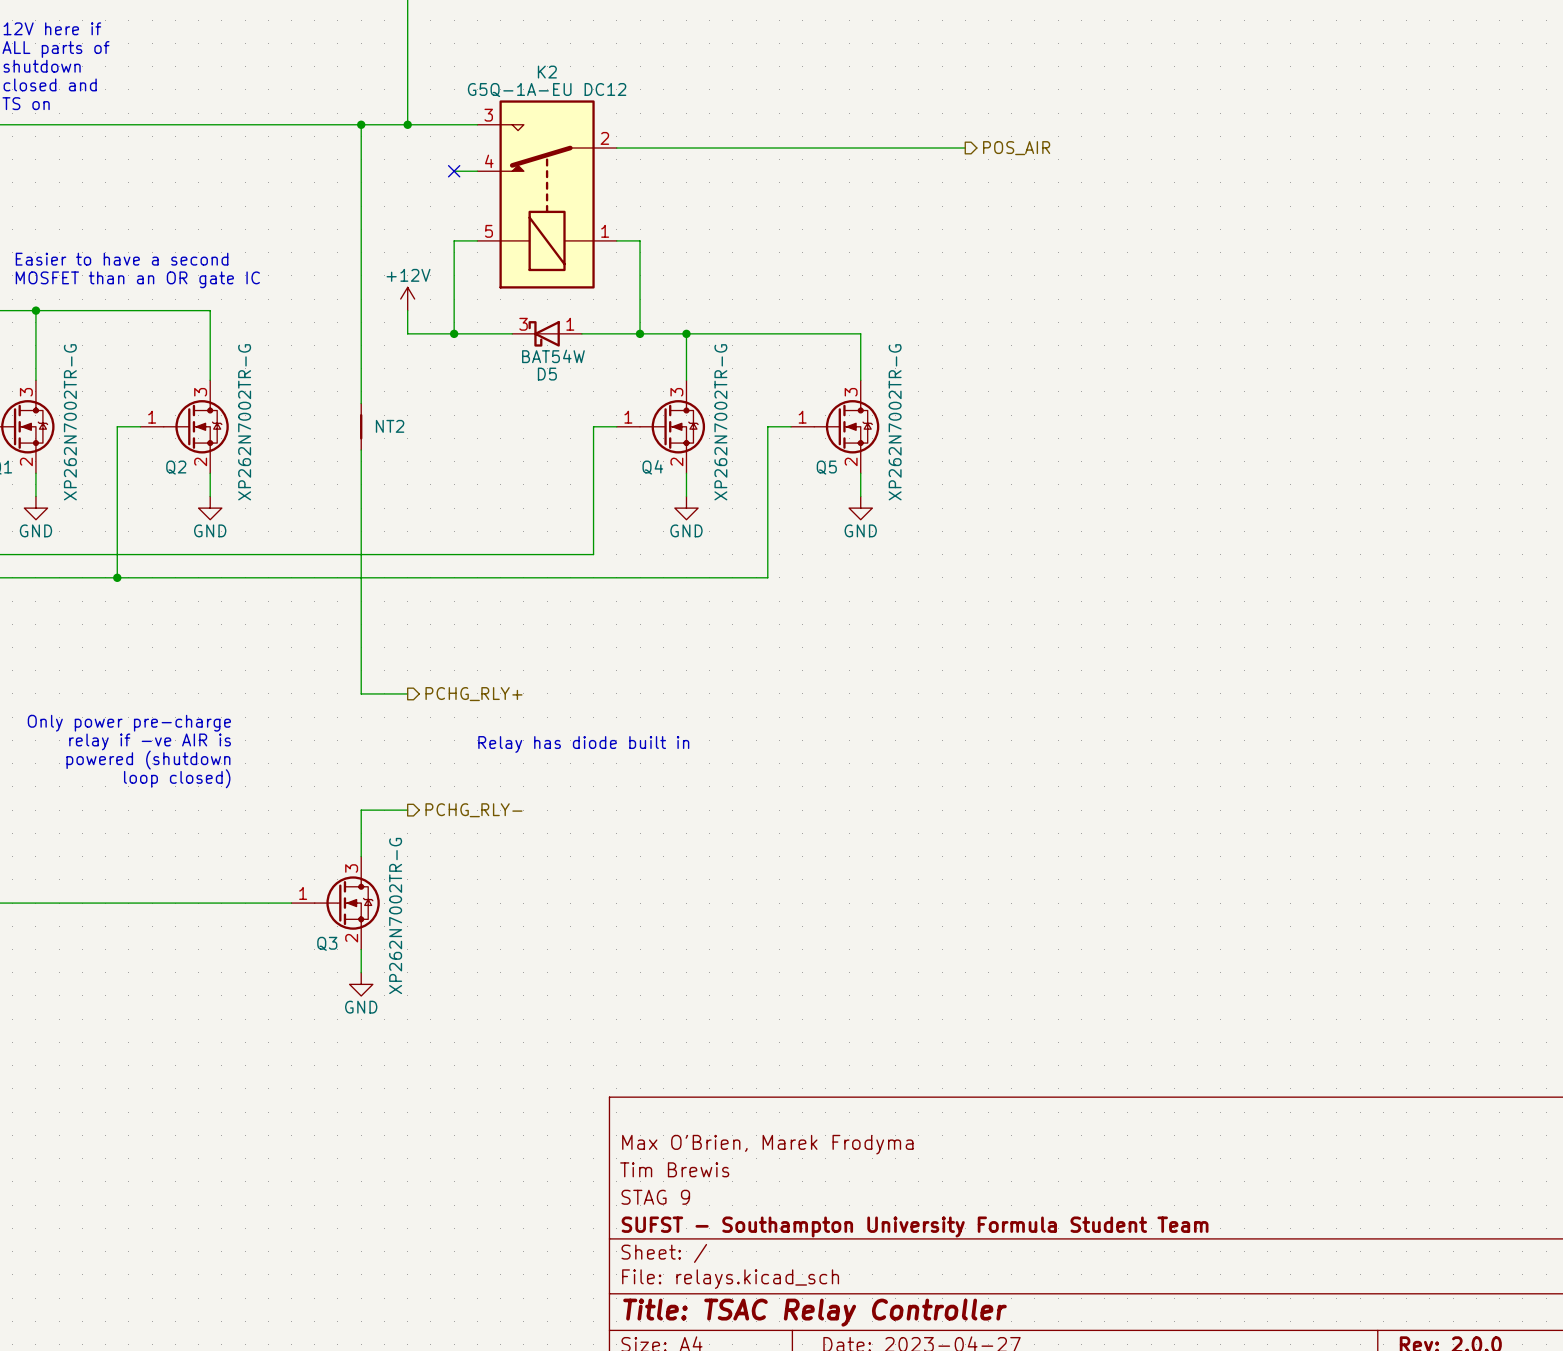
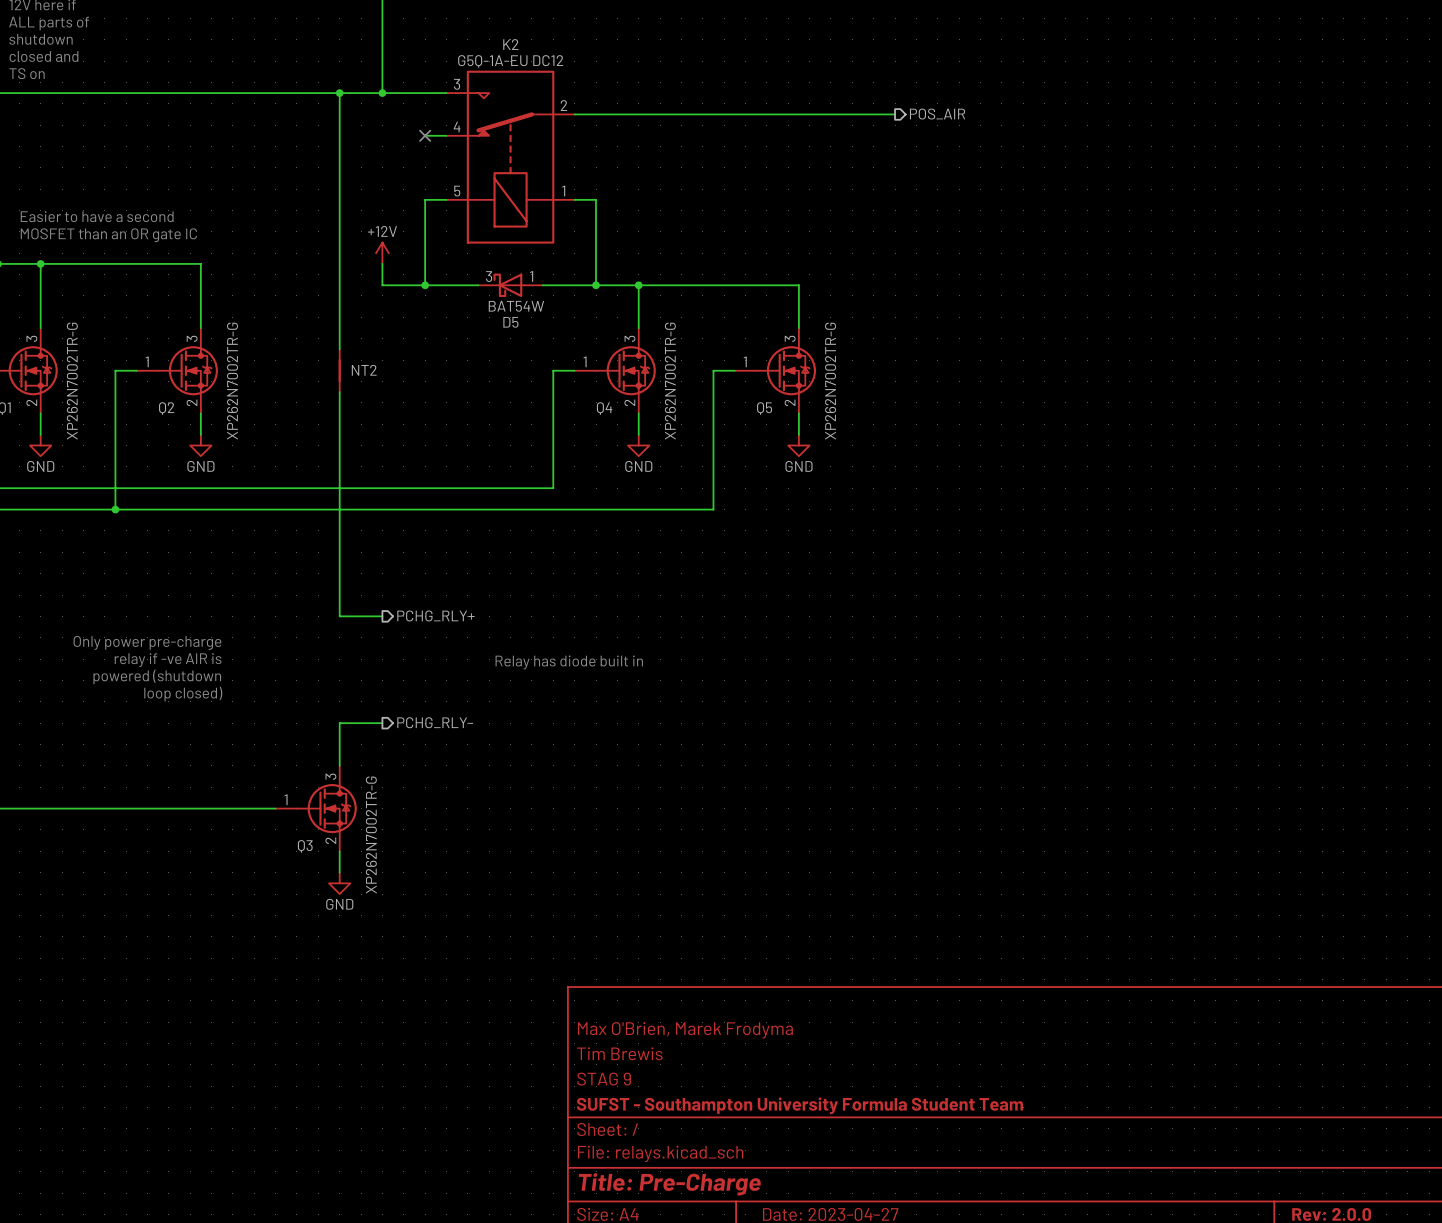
title block: Title: TSAC Relay Controller (815, 1312) -> Title: Pre-Charge (669, 1184)

